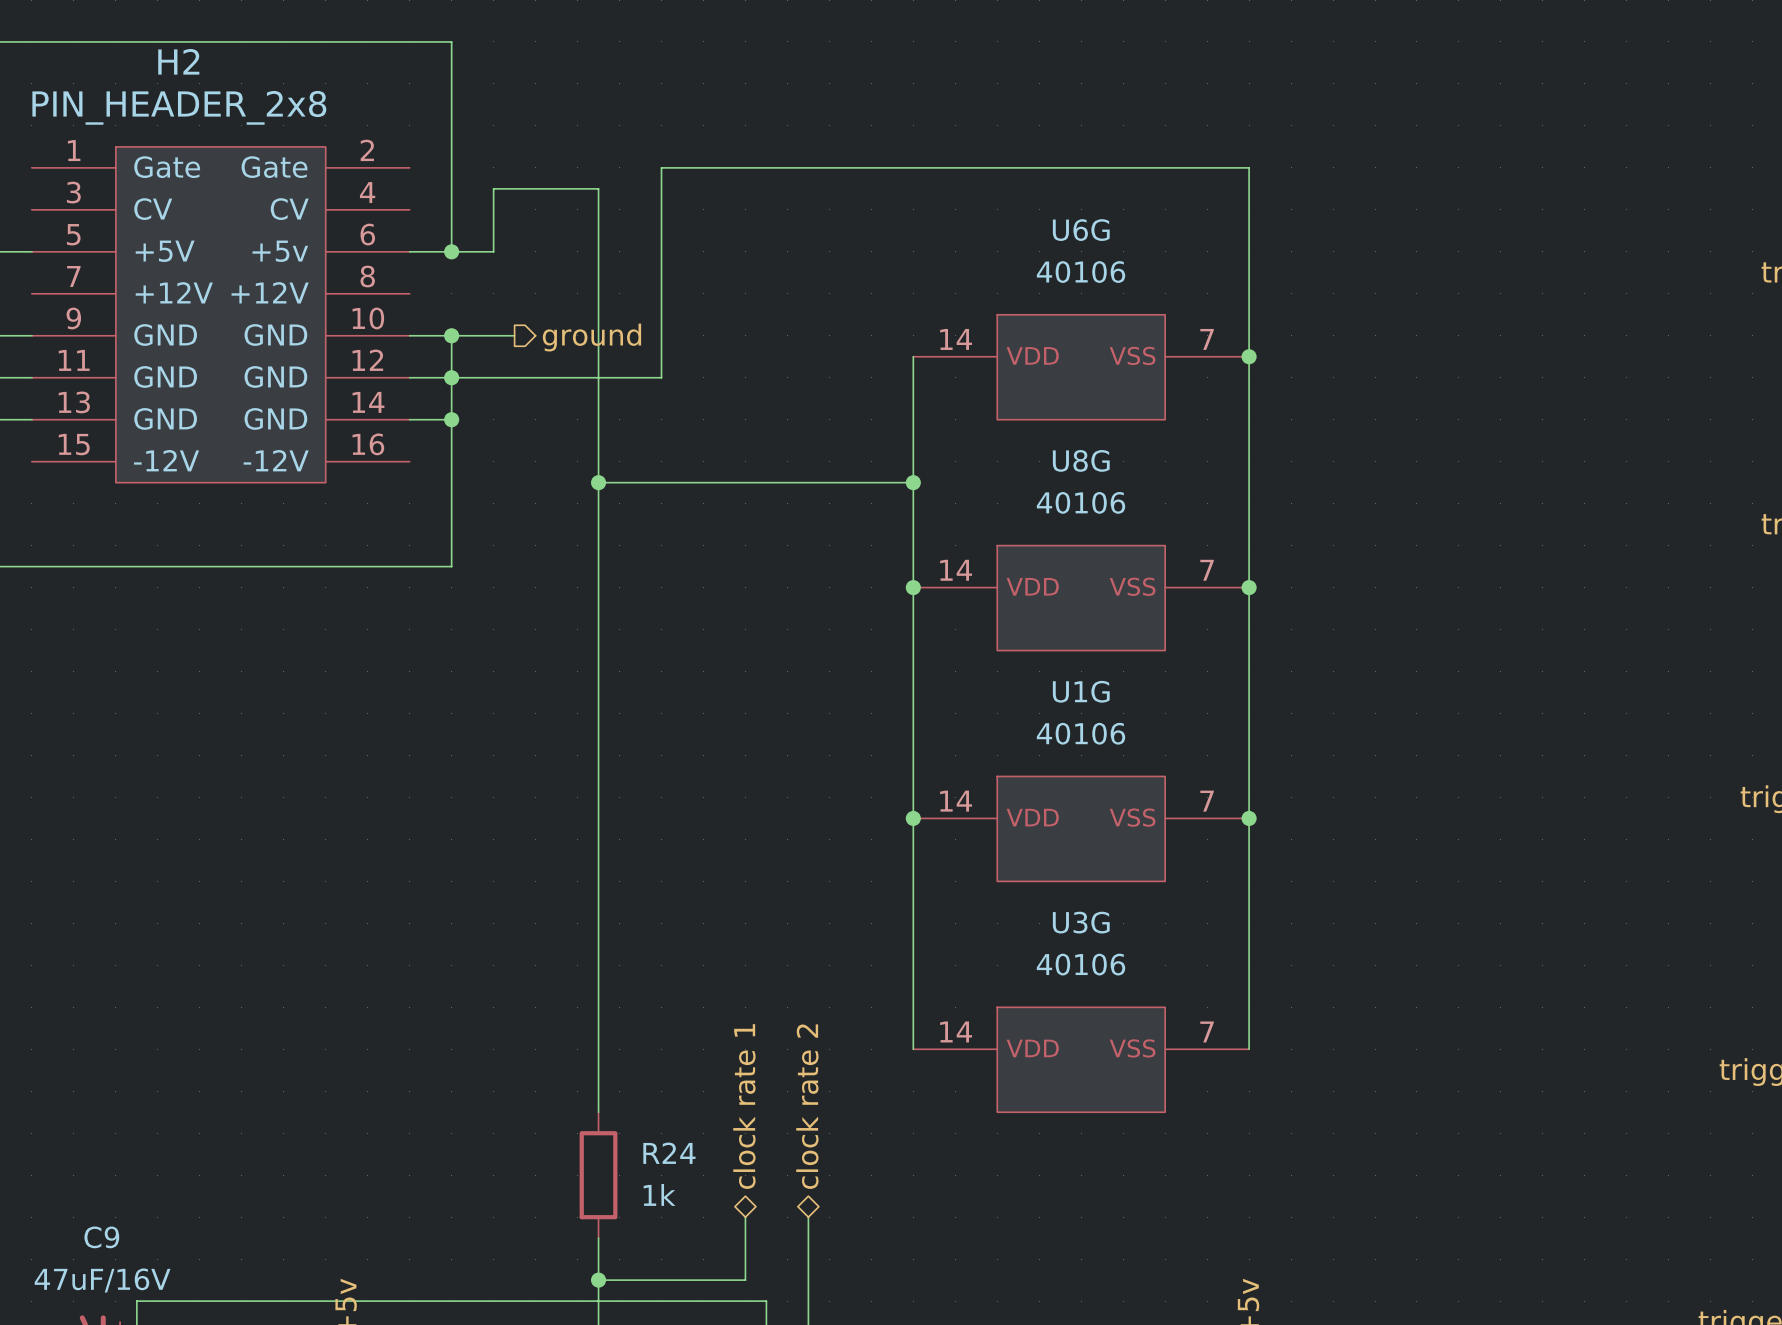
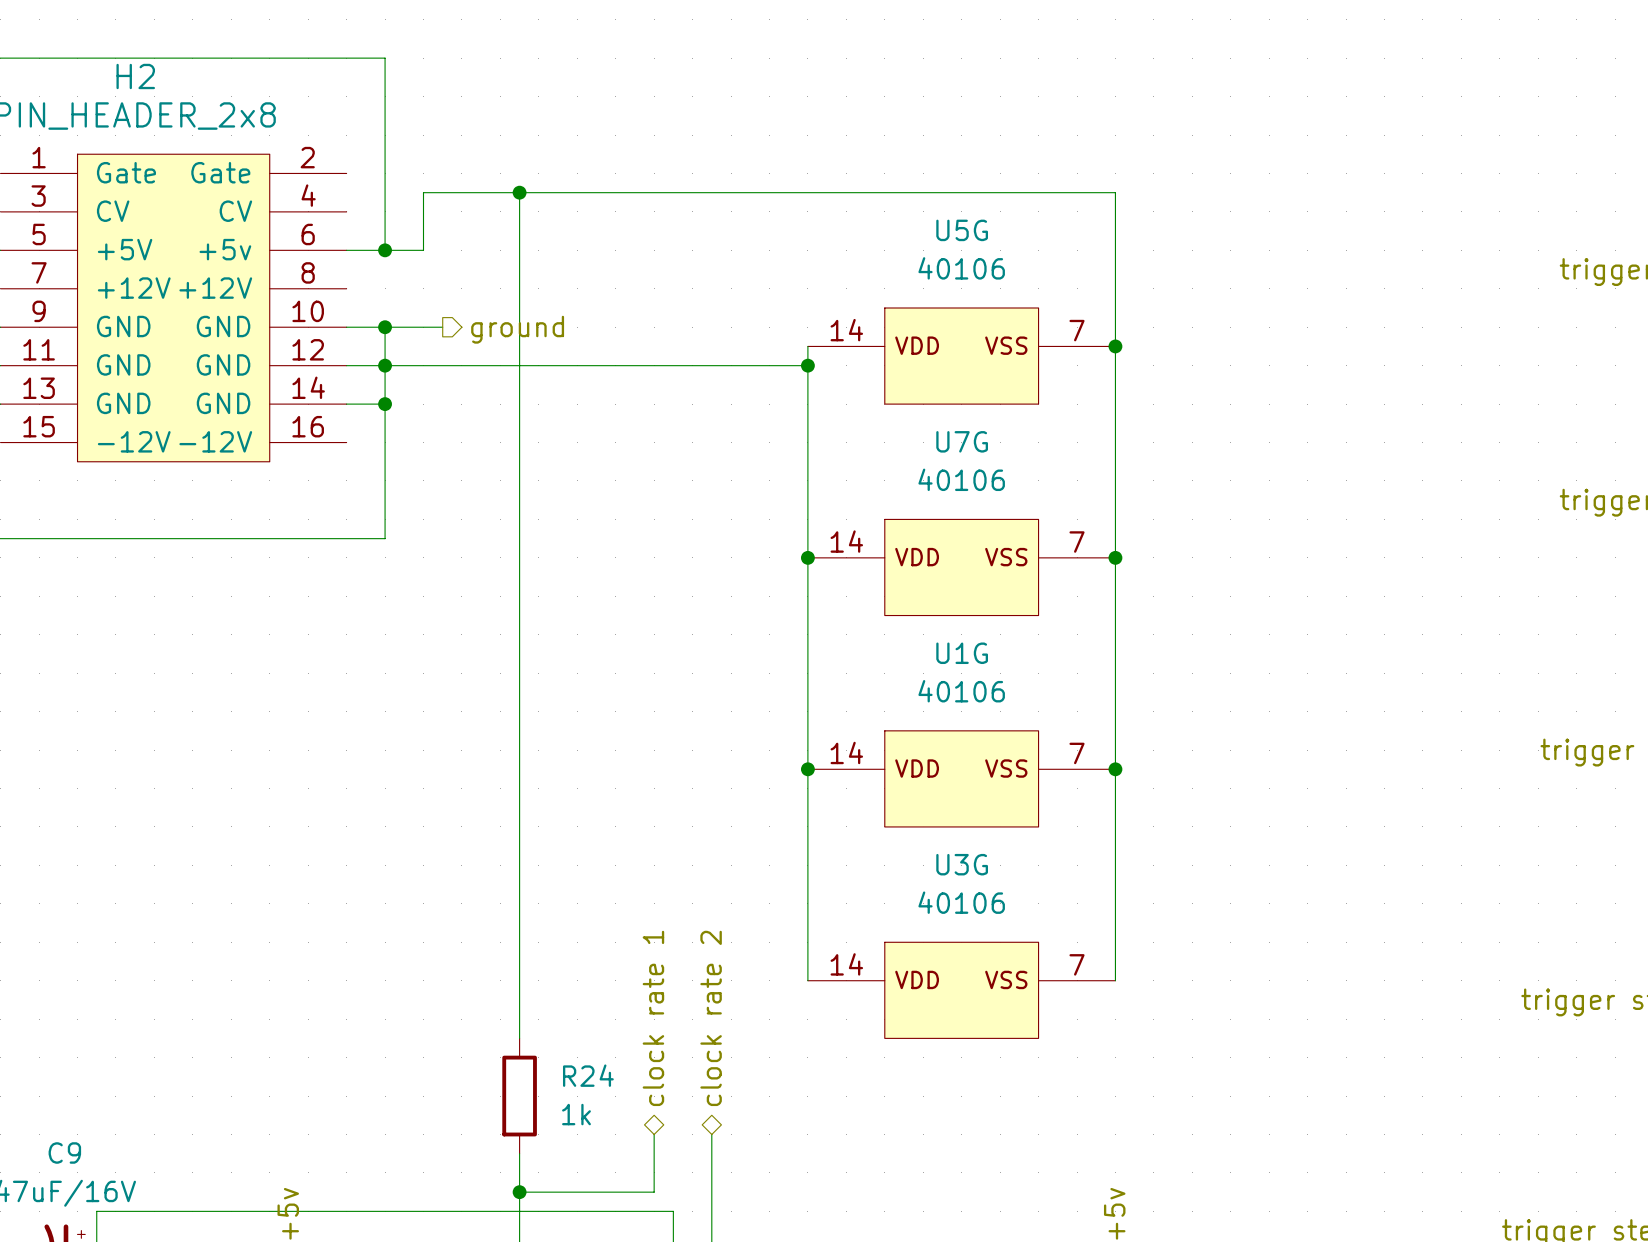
junction: none -> (519, 192)
wire: (1249, 188) (1249, 167) (661, 167) (661, 377) -> (1115, 192) (519, 192)
U6G name: U6G (1081, 230) -> U5G (962, 230)
wire: none -> (577, 365) (807, 365)
junction: none -> (807, 365)
U8G name: U8G (1081, 460) -> U7G (962, 441)
wire: (598, 482) (913, 482) -> none
junction: (598, 482) -> none
junction: (913, 482) -> none

